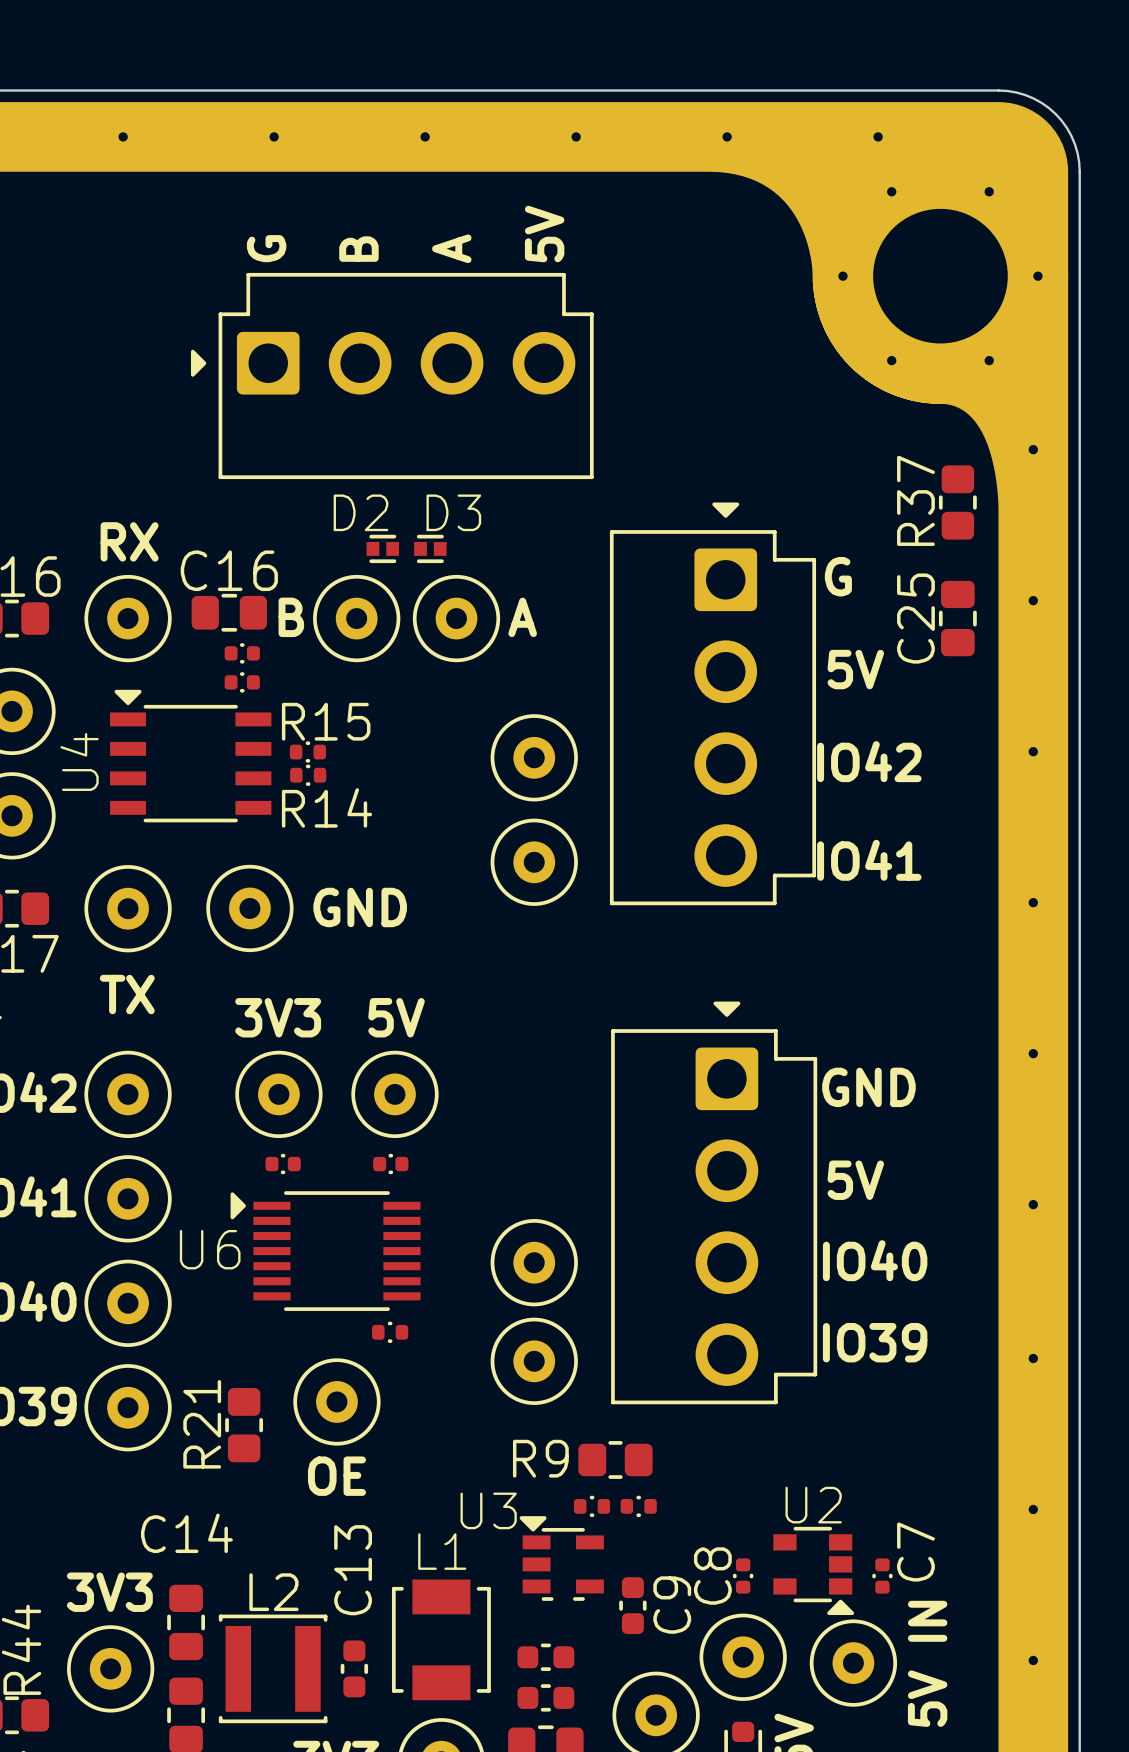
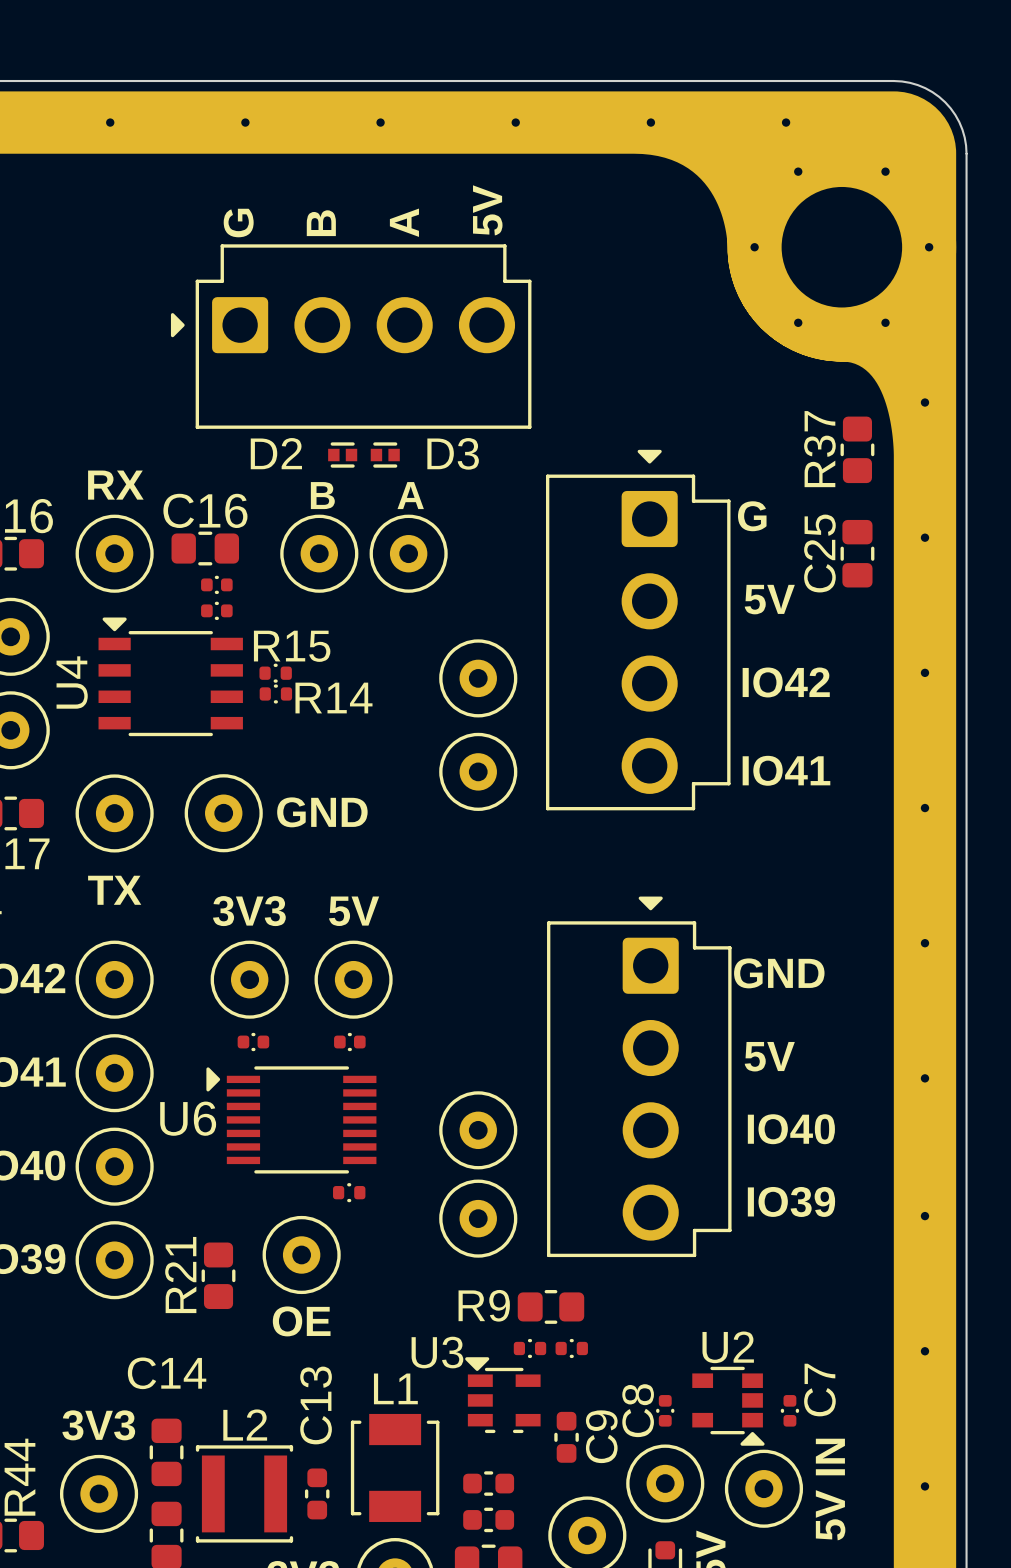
D2 name position: D2 (360, 512) -> D2 (276, 453)
D3 name position: D3 (453, 512) -> D3 (453, 453)
D2 position: (382, 548) -> (342, 455)
D3 position: (430, 548) -> (385, 455)
text position: B (291, 617) -> B (322, 495)
text position: A (522, 617) -> A (410, 495)
R14 name position: R14 (326, 807) -> R14 (333, 698)

